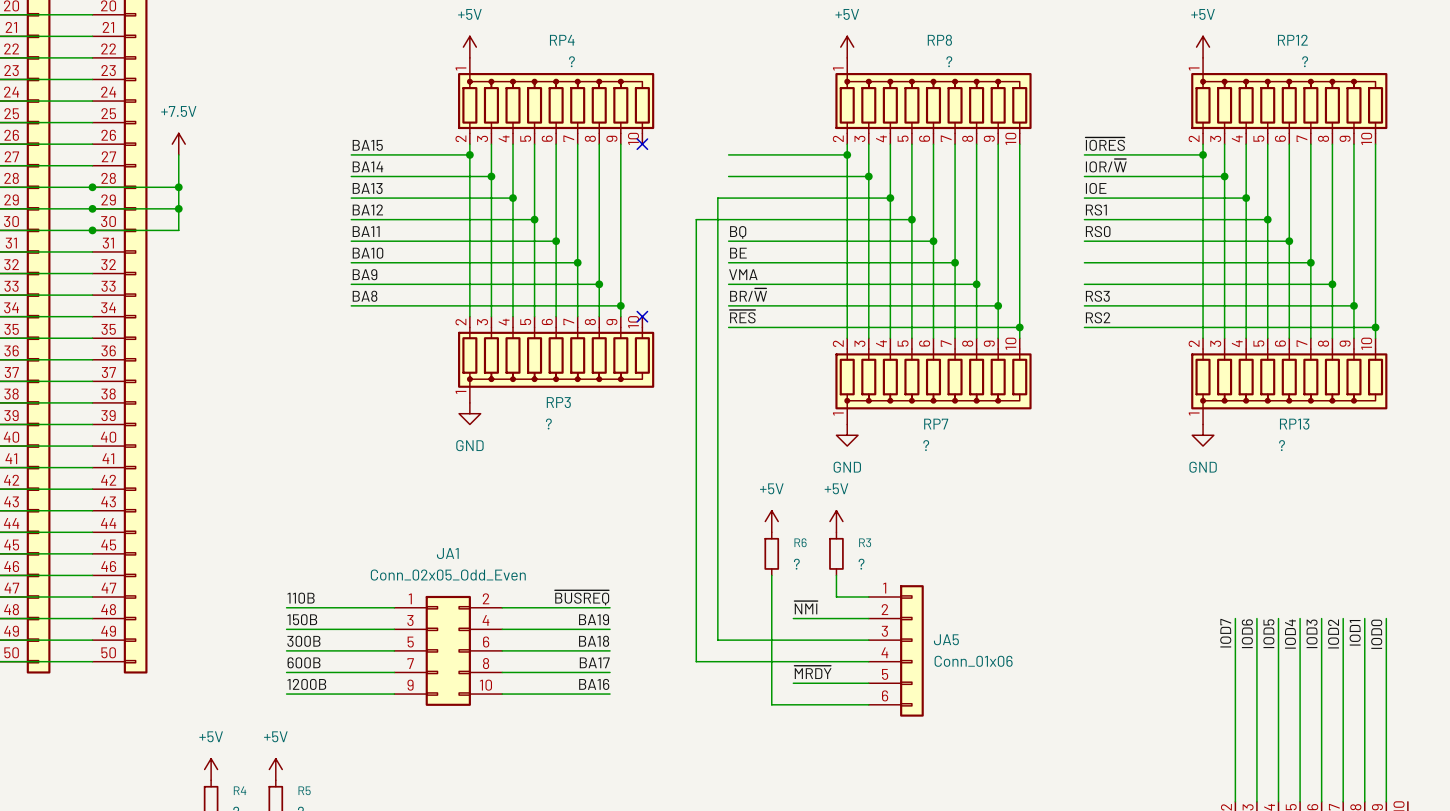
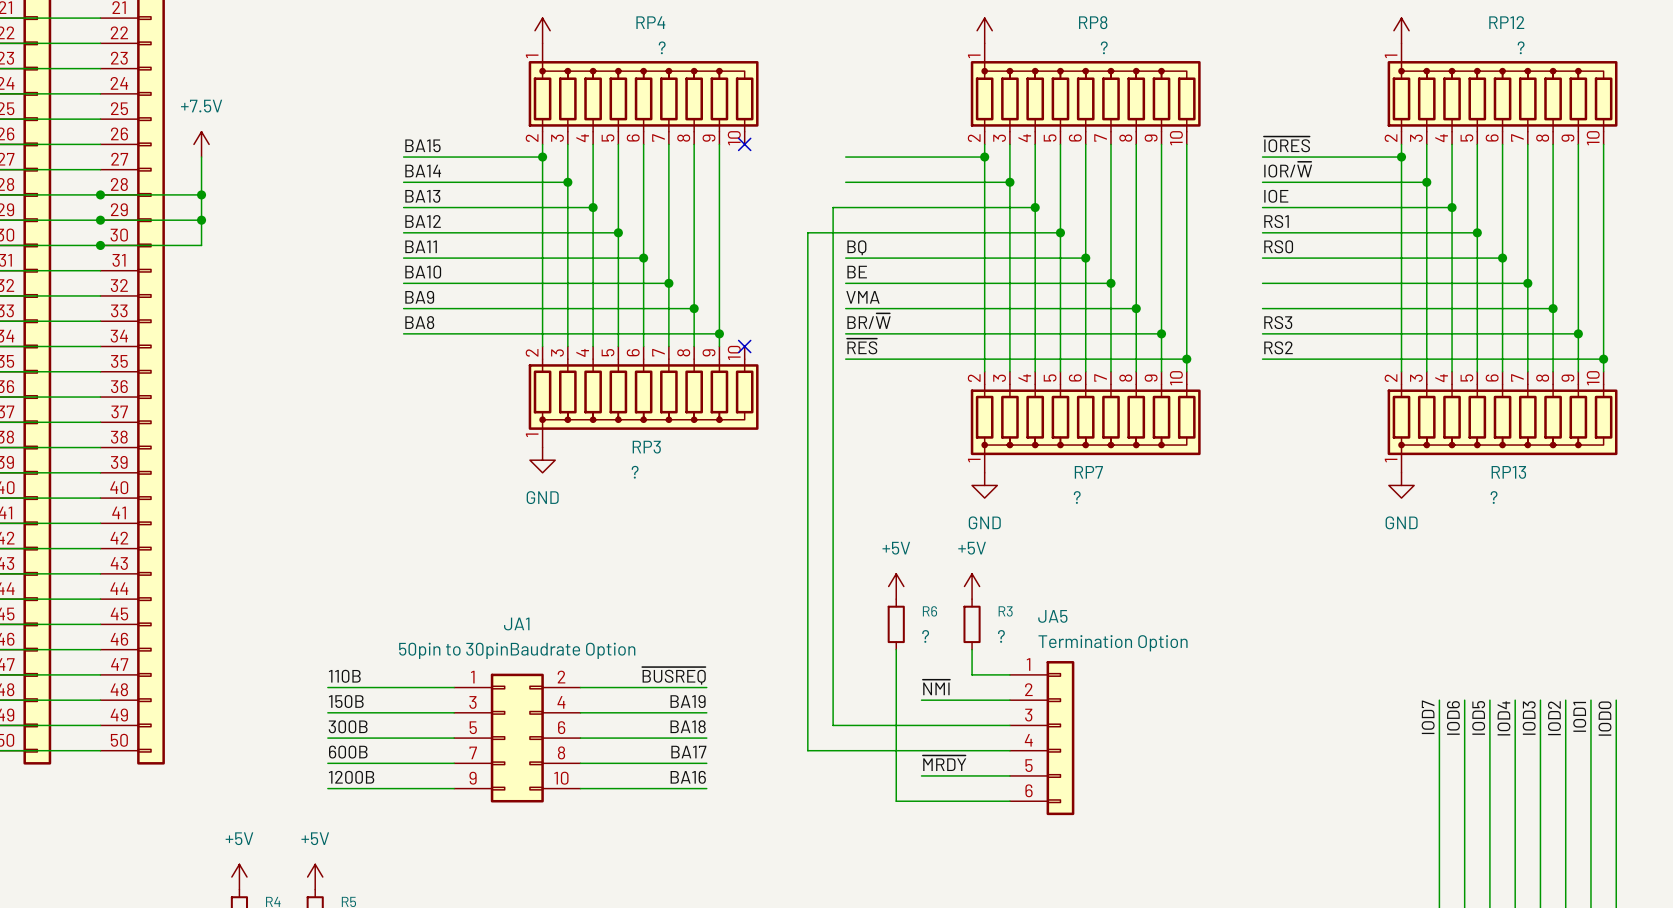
JA1 value: Conn_02x05_Odd_Even (448, 575) -> 50pin to 30pinBaudrate Option (517, 650)
JA5 name position: JA5 (946, 639) -> JA5 (1052, 616)
JA5 value: Conn_01x06 (973, 661) -> Termination Option (1113, 643)

